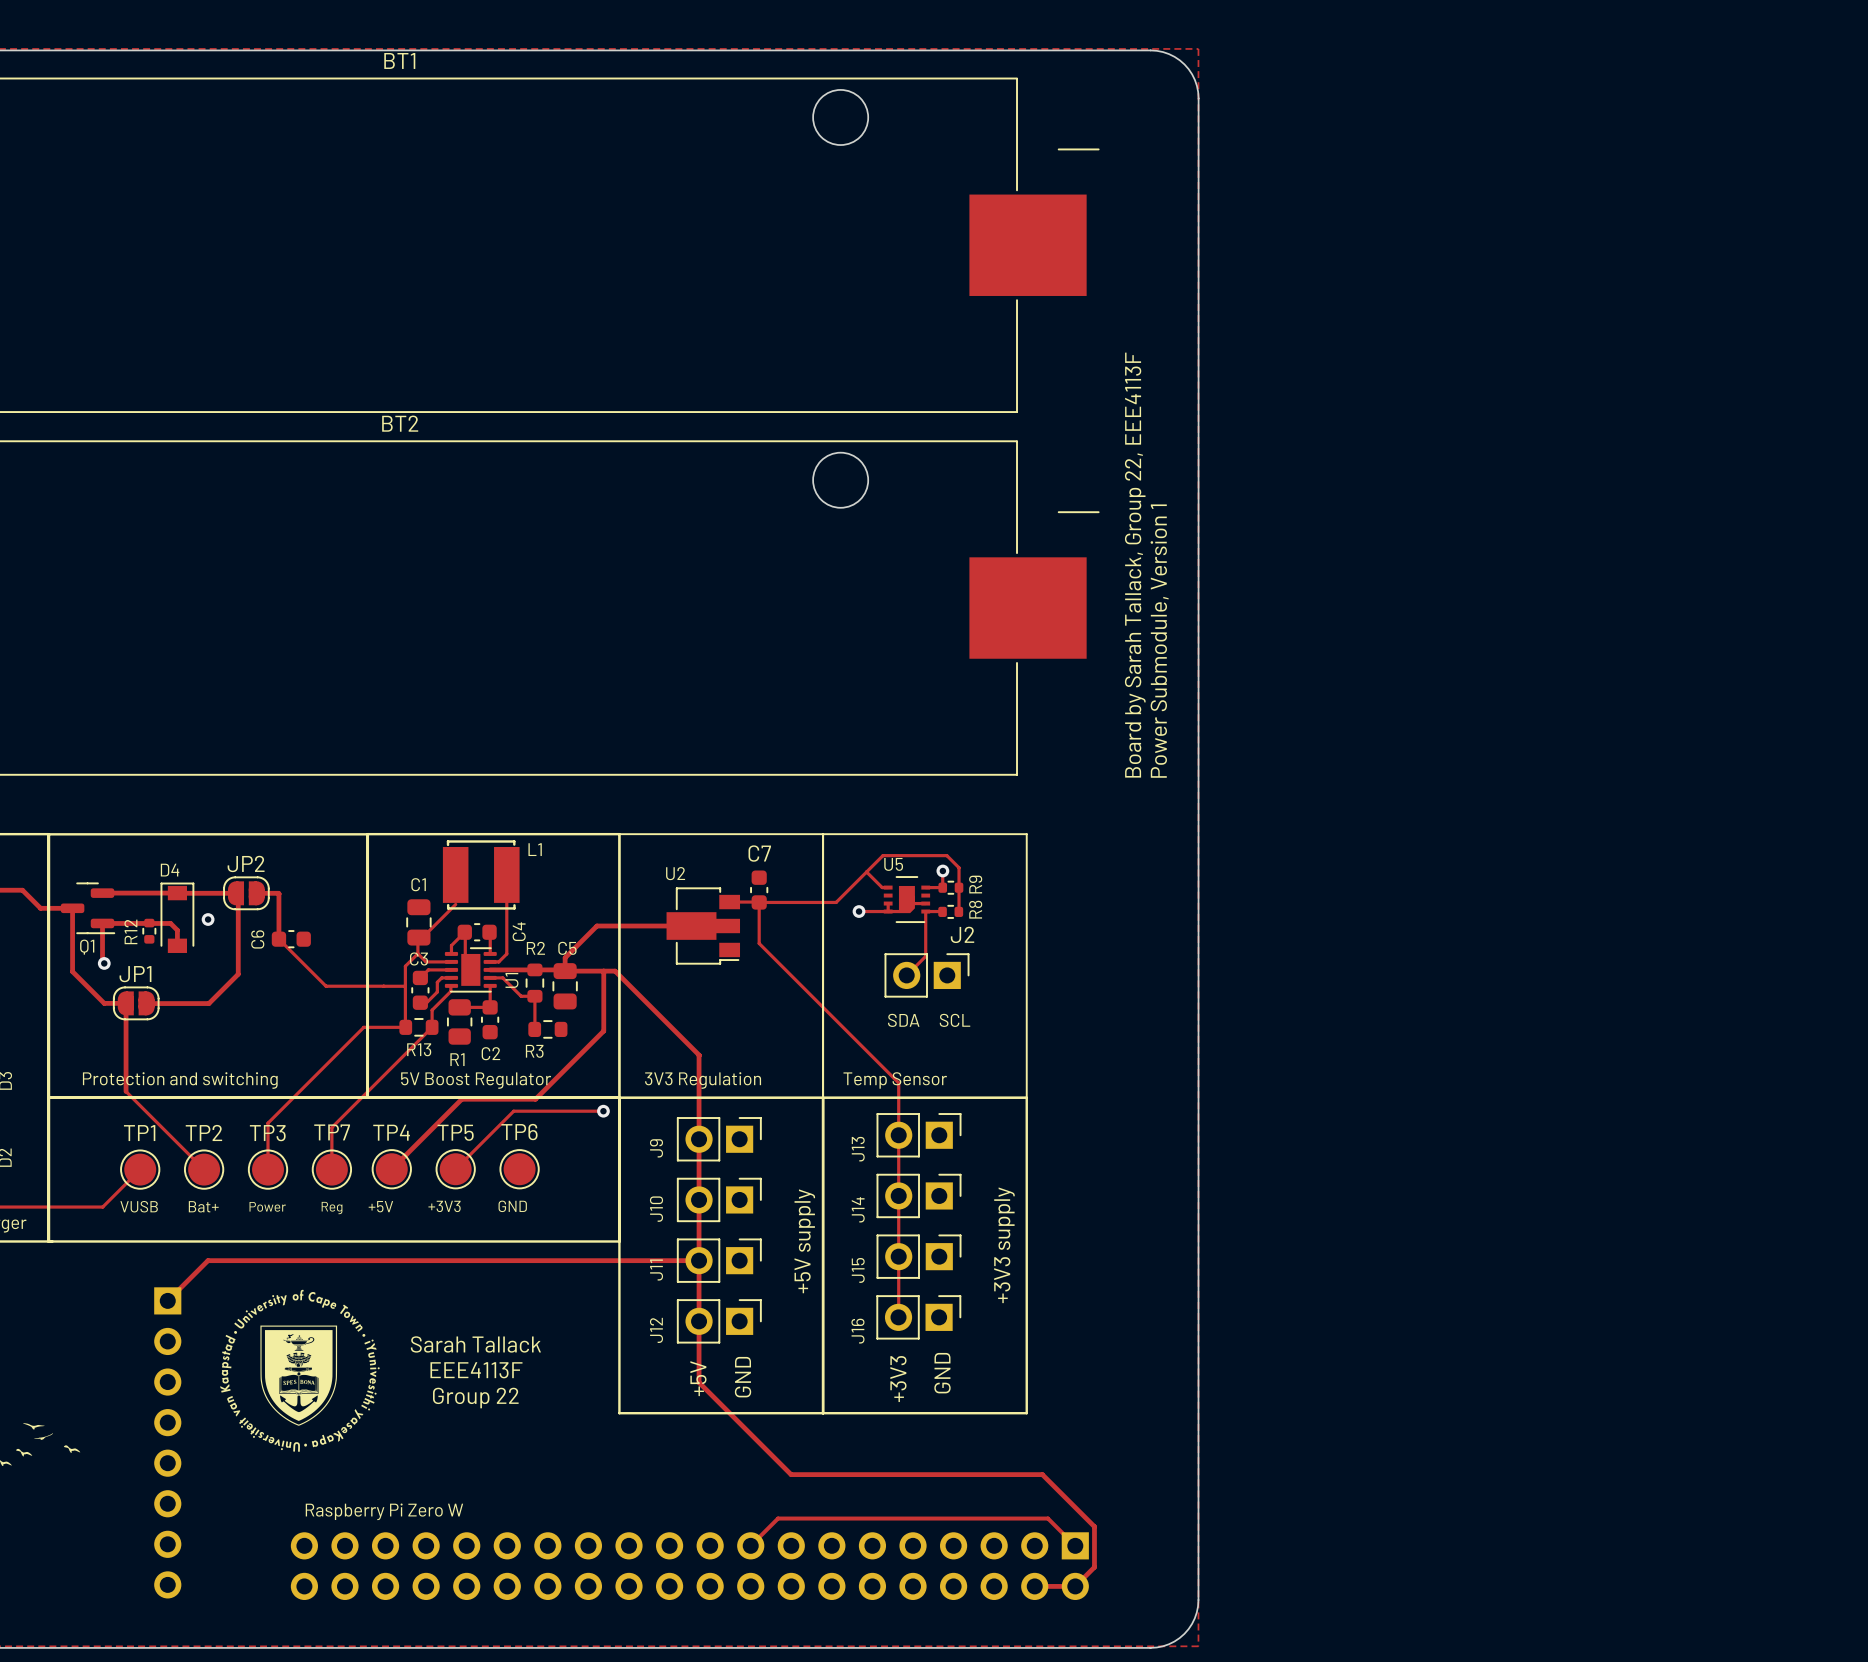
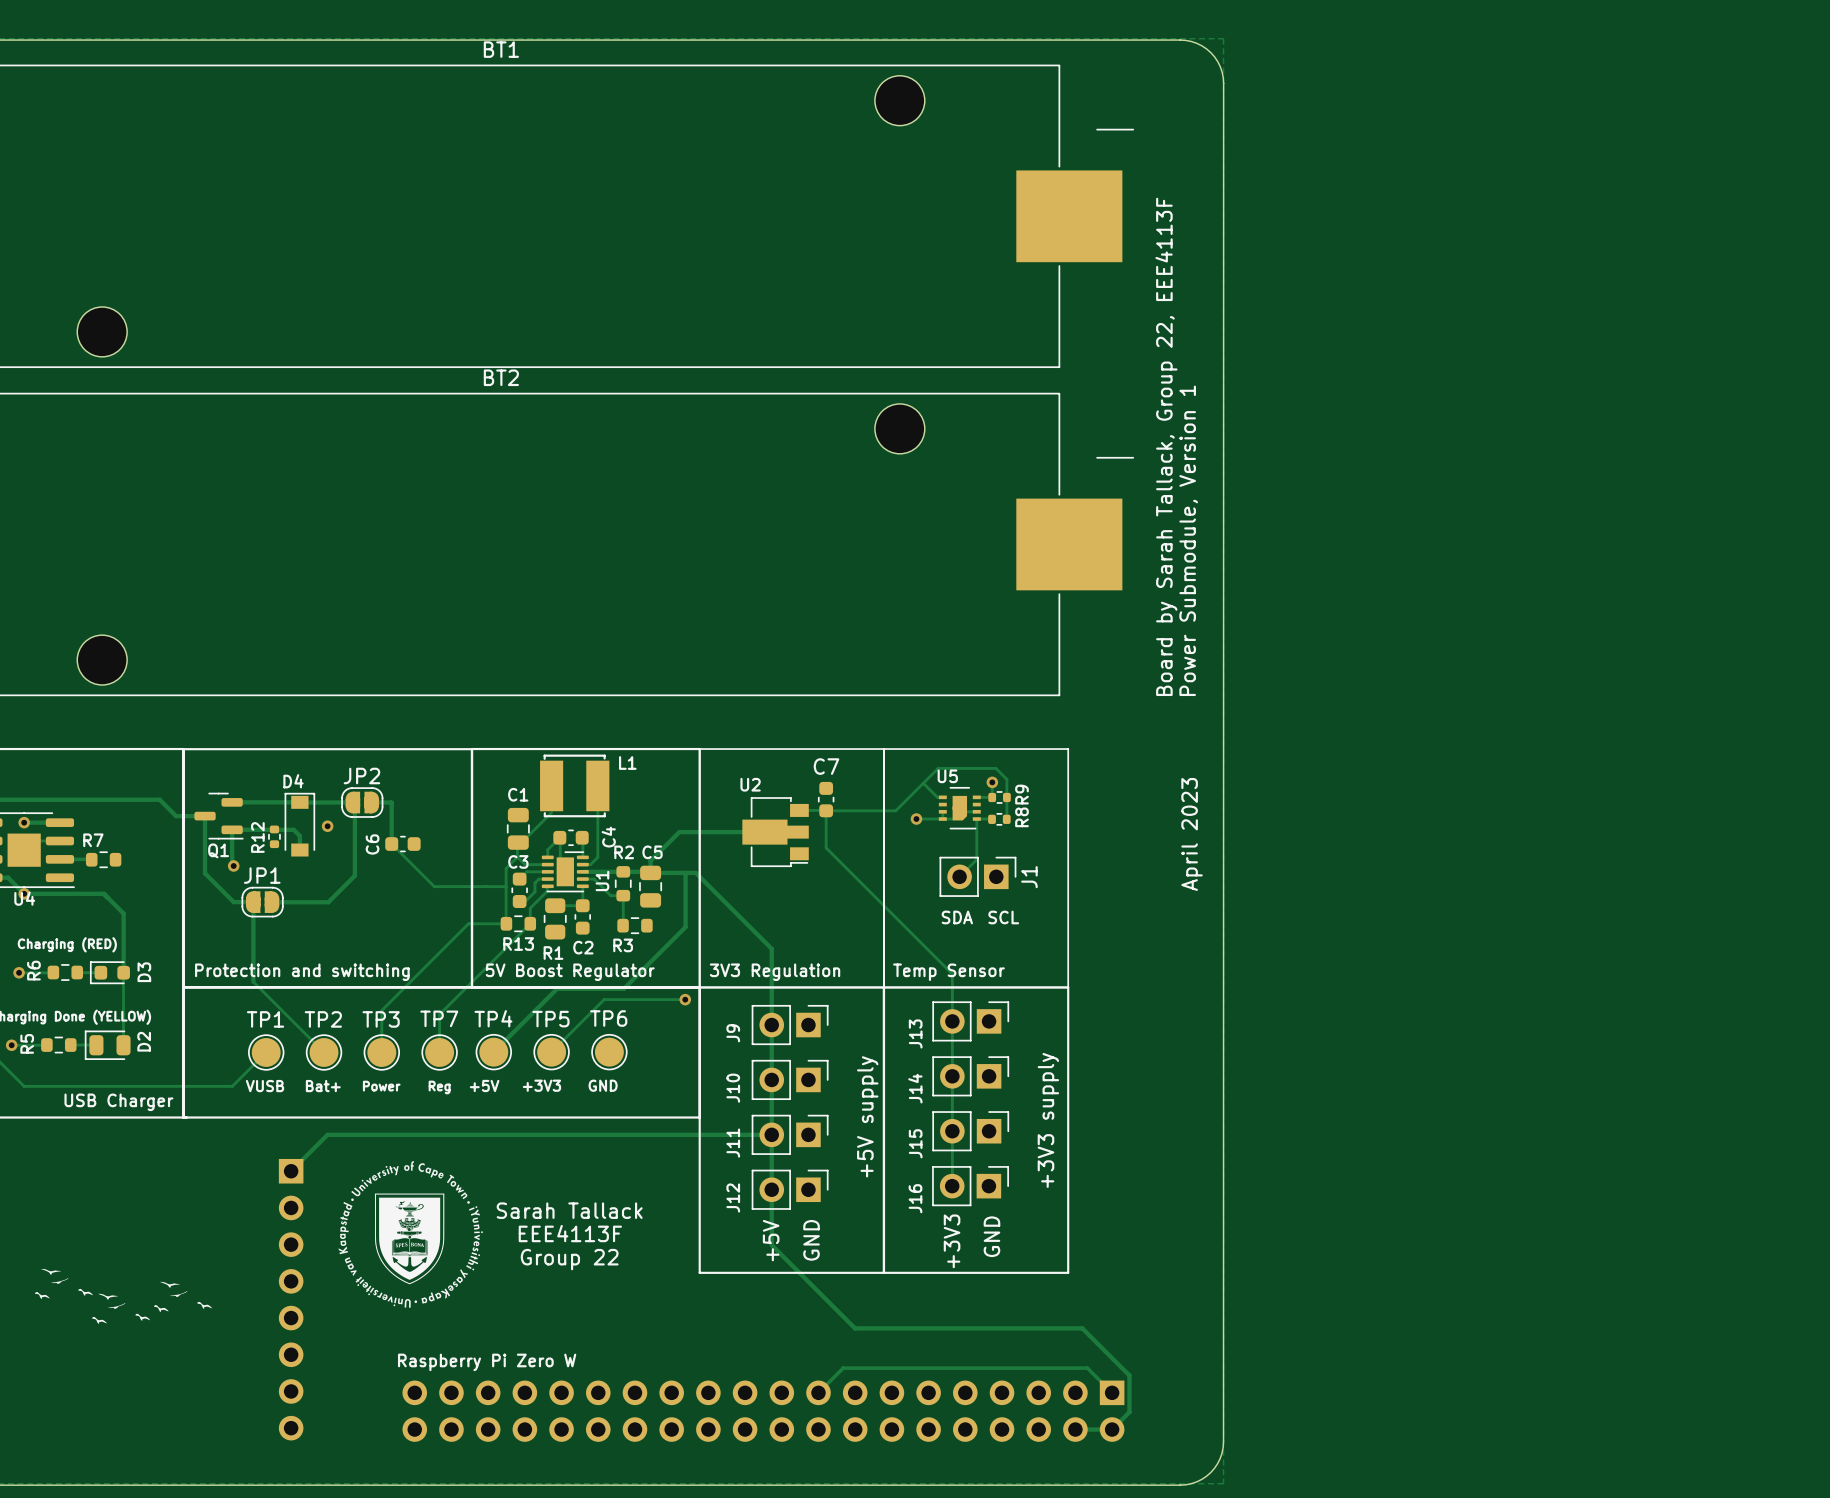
text: none -> April 2023 (1192, 834)
J2 name: J2 (962, 934) -> J1 (1029, 877)

